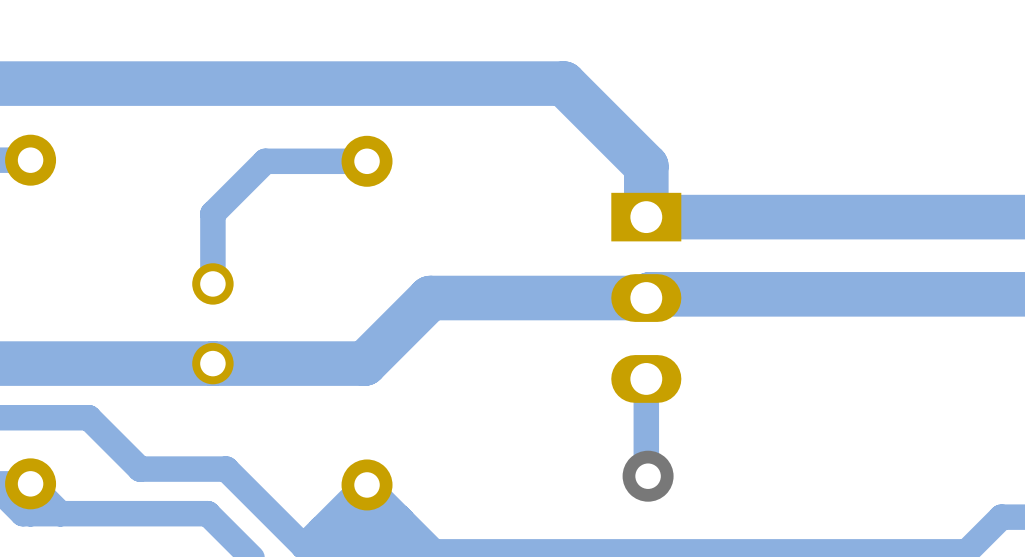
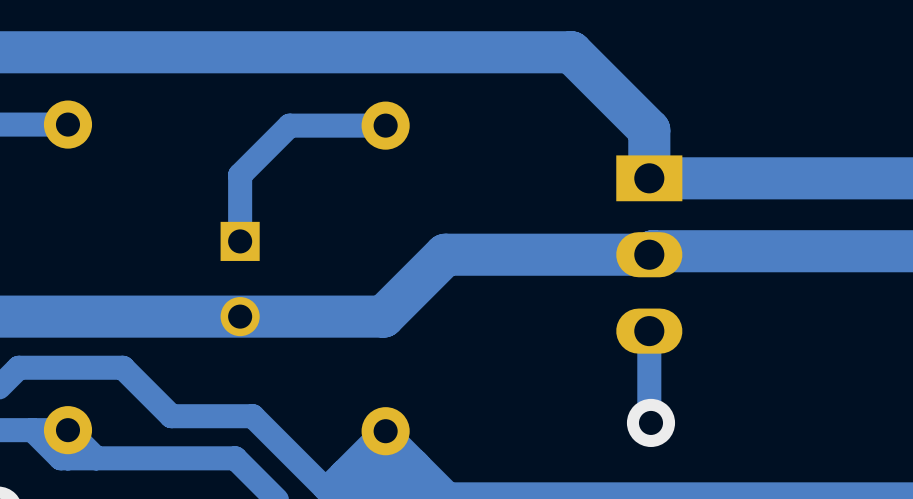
part footprint: [192, 263, 234, 385] -> [220, 221, 260, 337]

